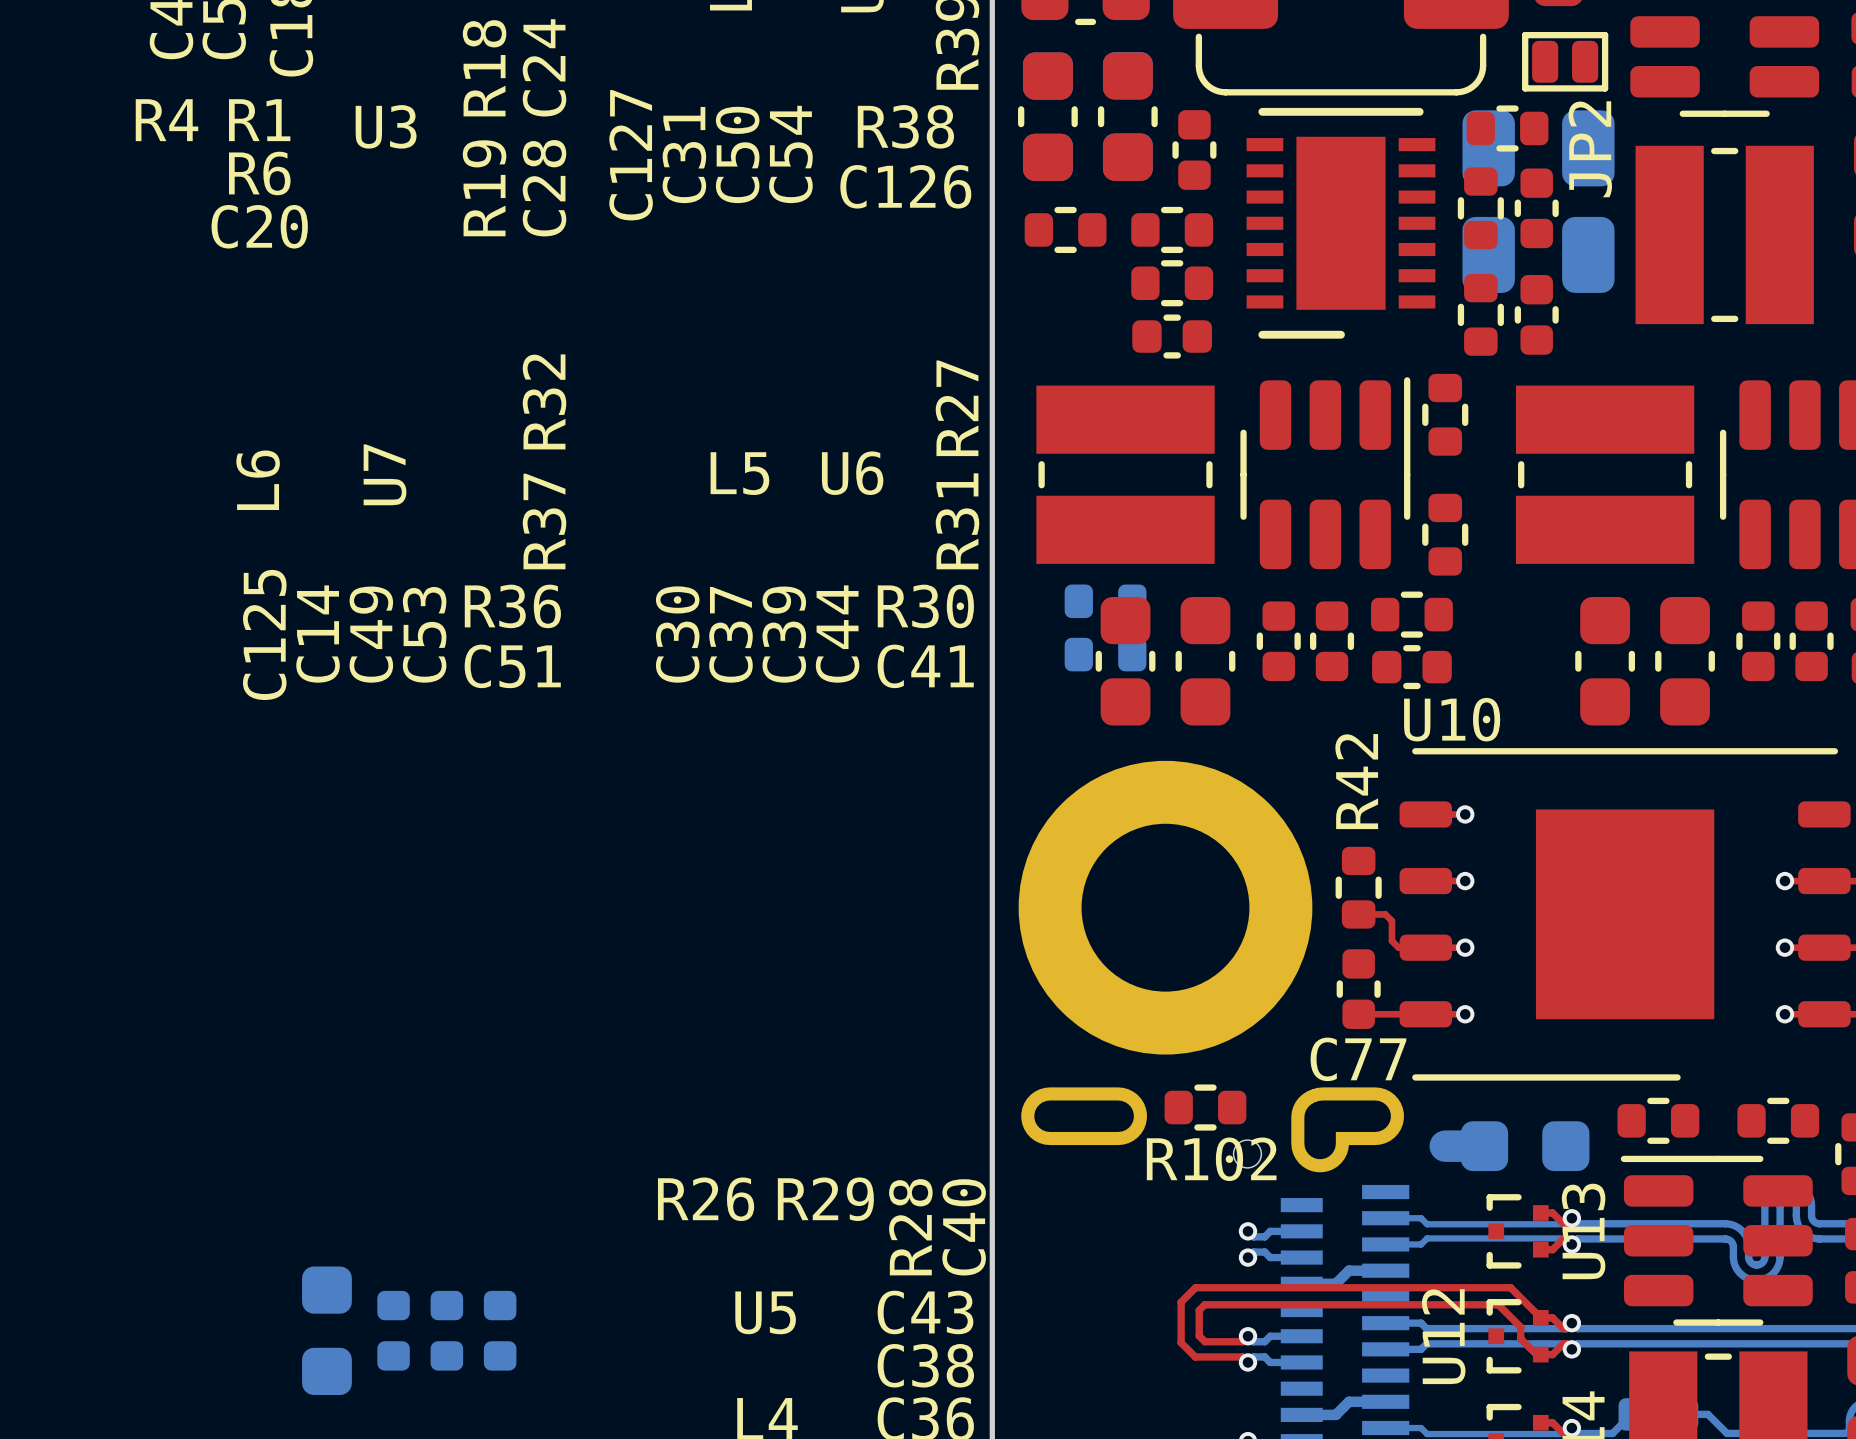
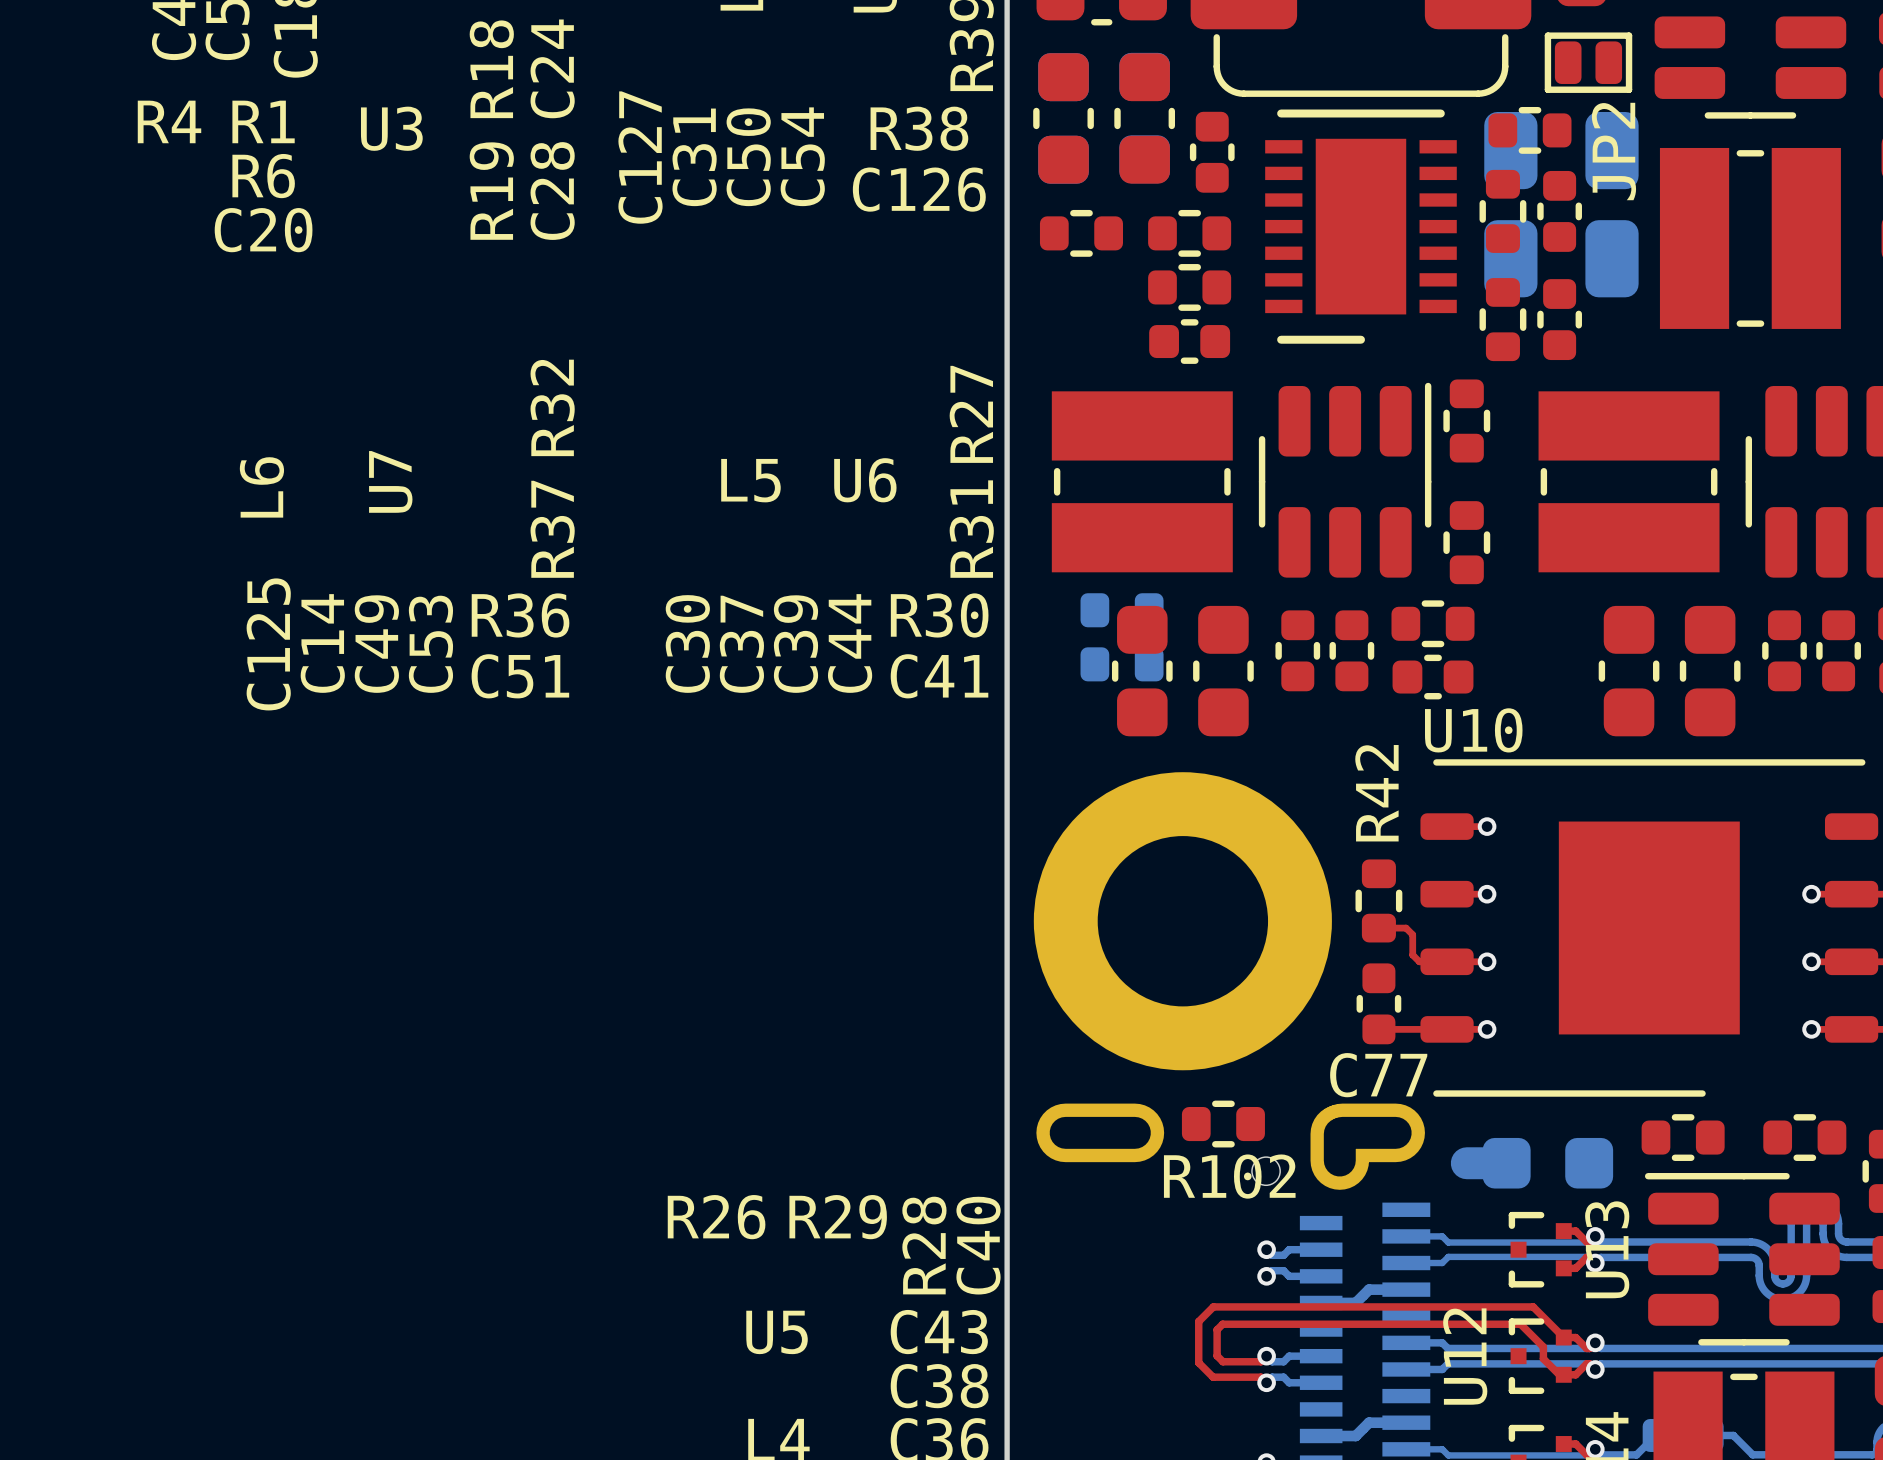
part: (326, 1330) -> none
part: (393, 1330) -> none
part: (446, 1330) -> none
part: (500, 1330) -> none

